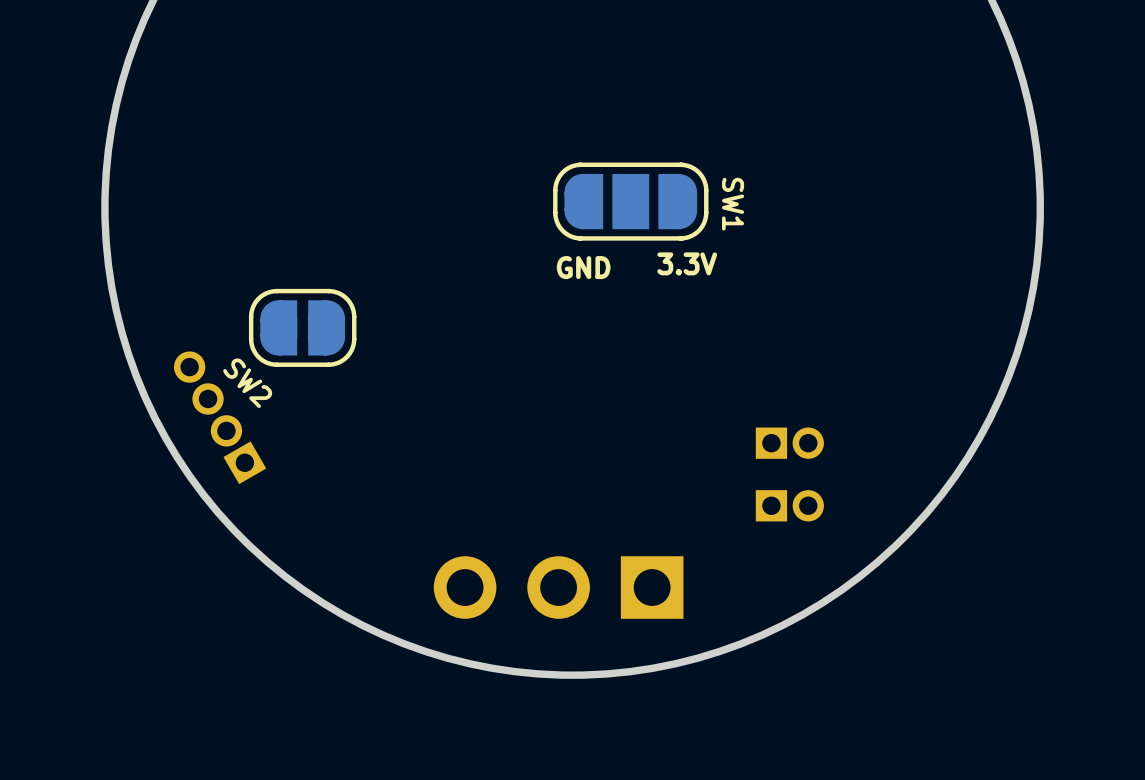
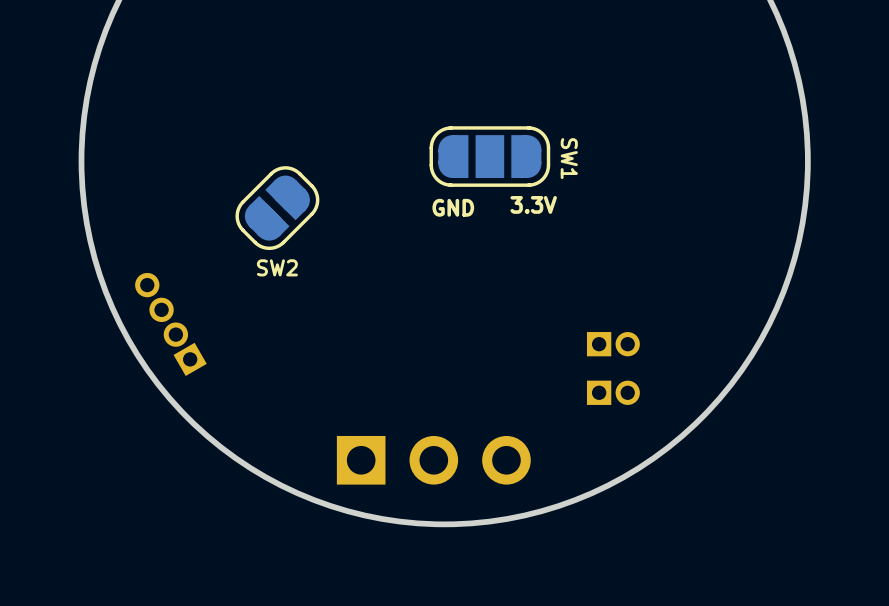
SW2 footprint: [248, 288, 357, 367] -> [235, 166, 320, 251]
part rotation: 0° (558, 587) -> 180° (433, 460)

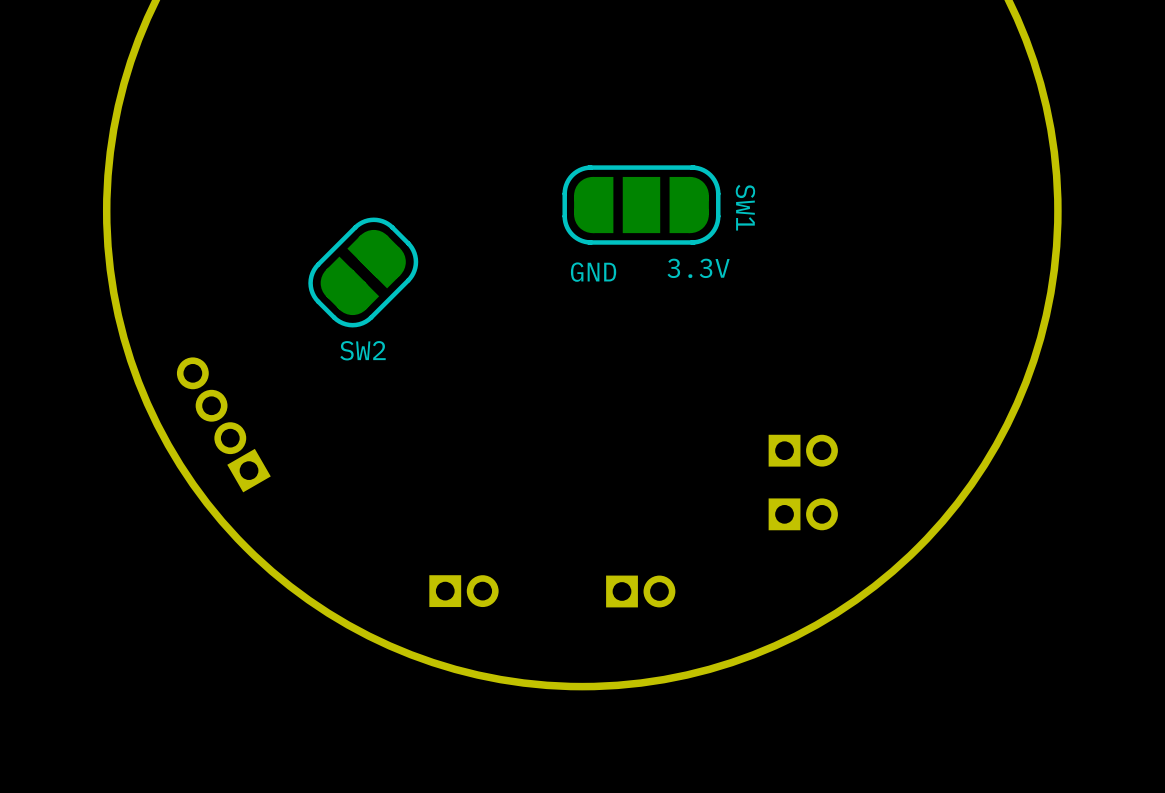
part: none -> (463, 591)
part: none -> (640, 591)
part: (433, 460) -> none

